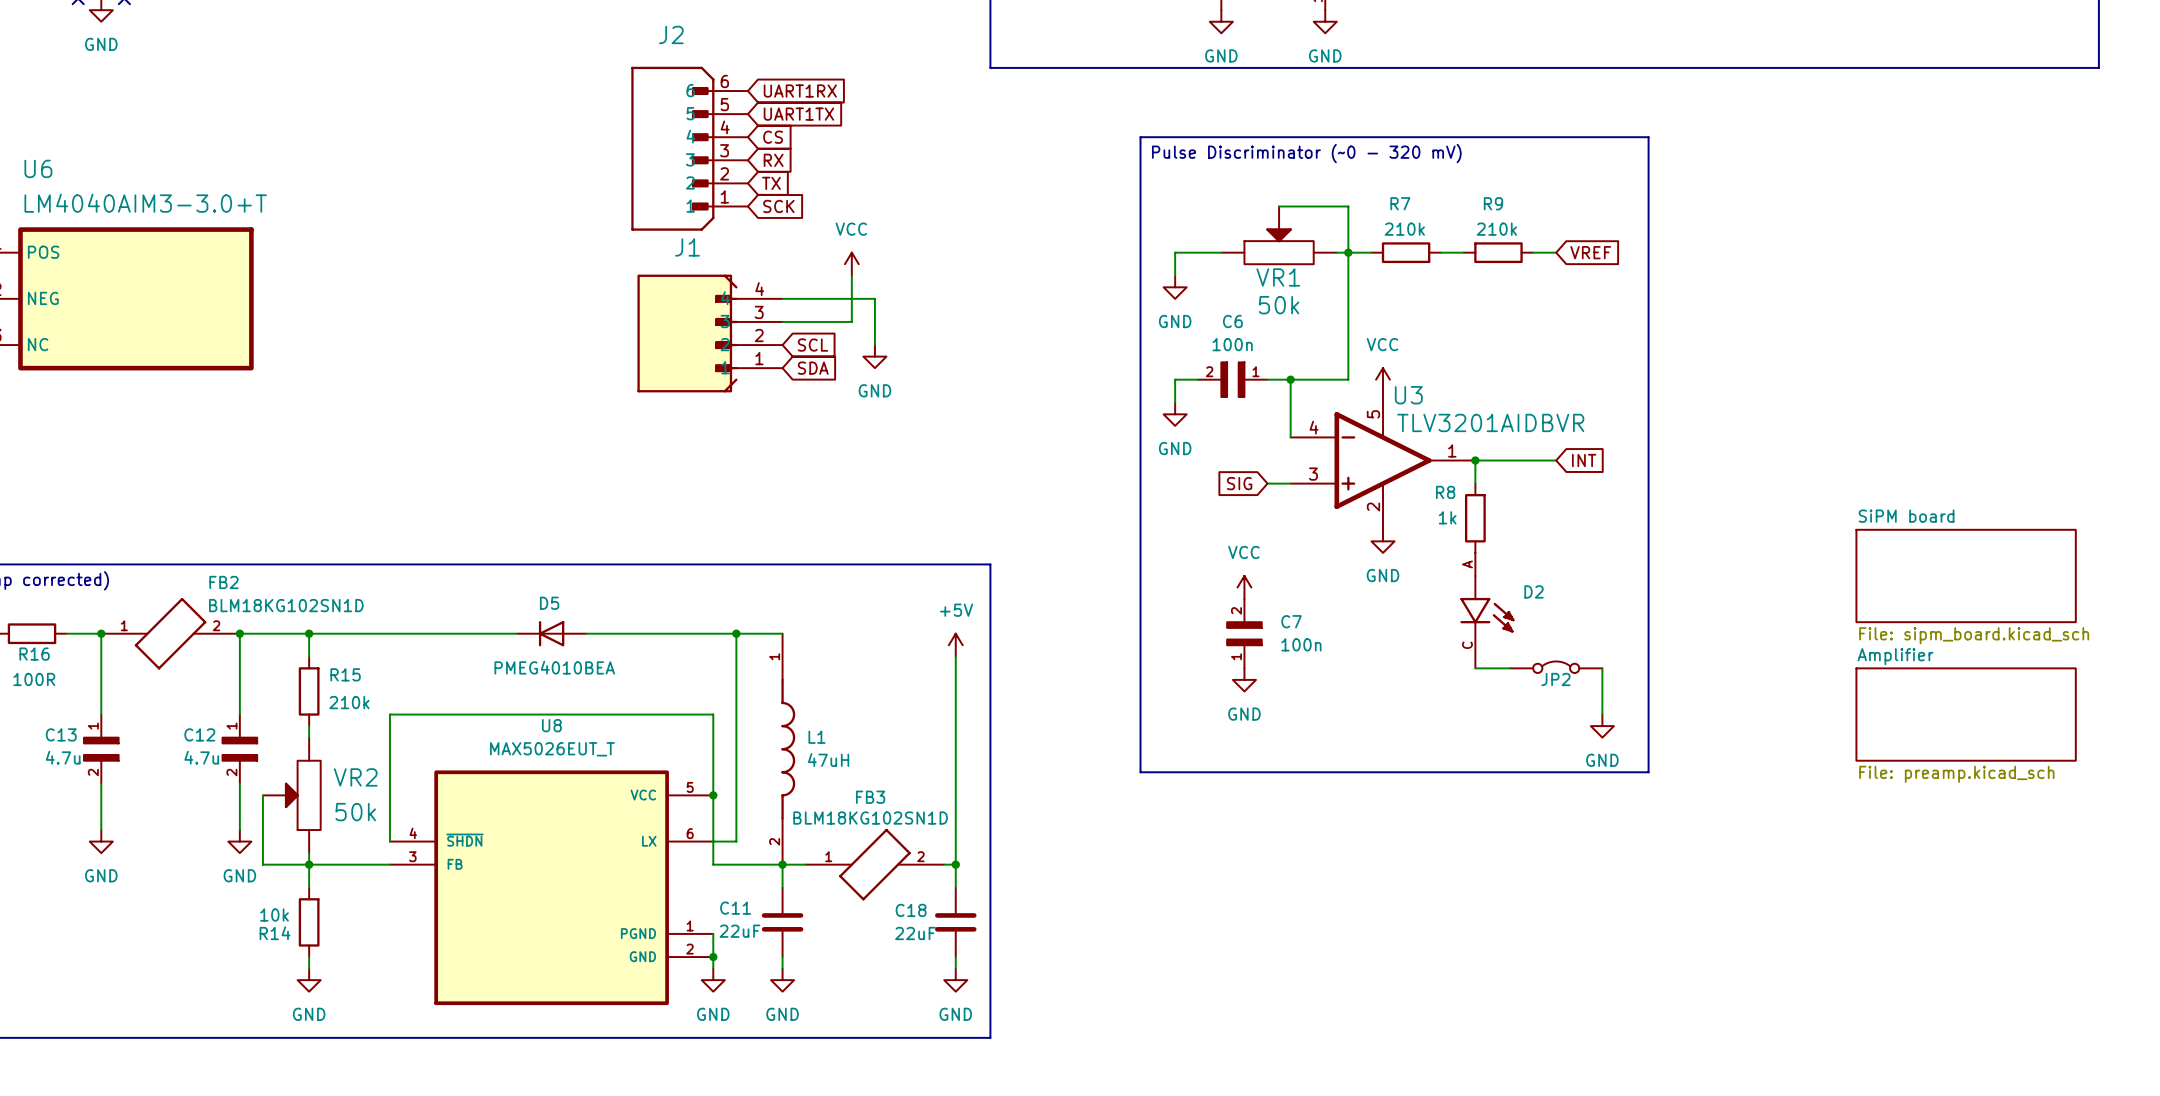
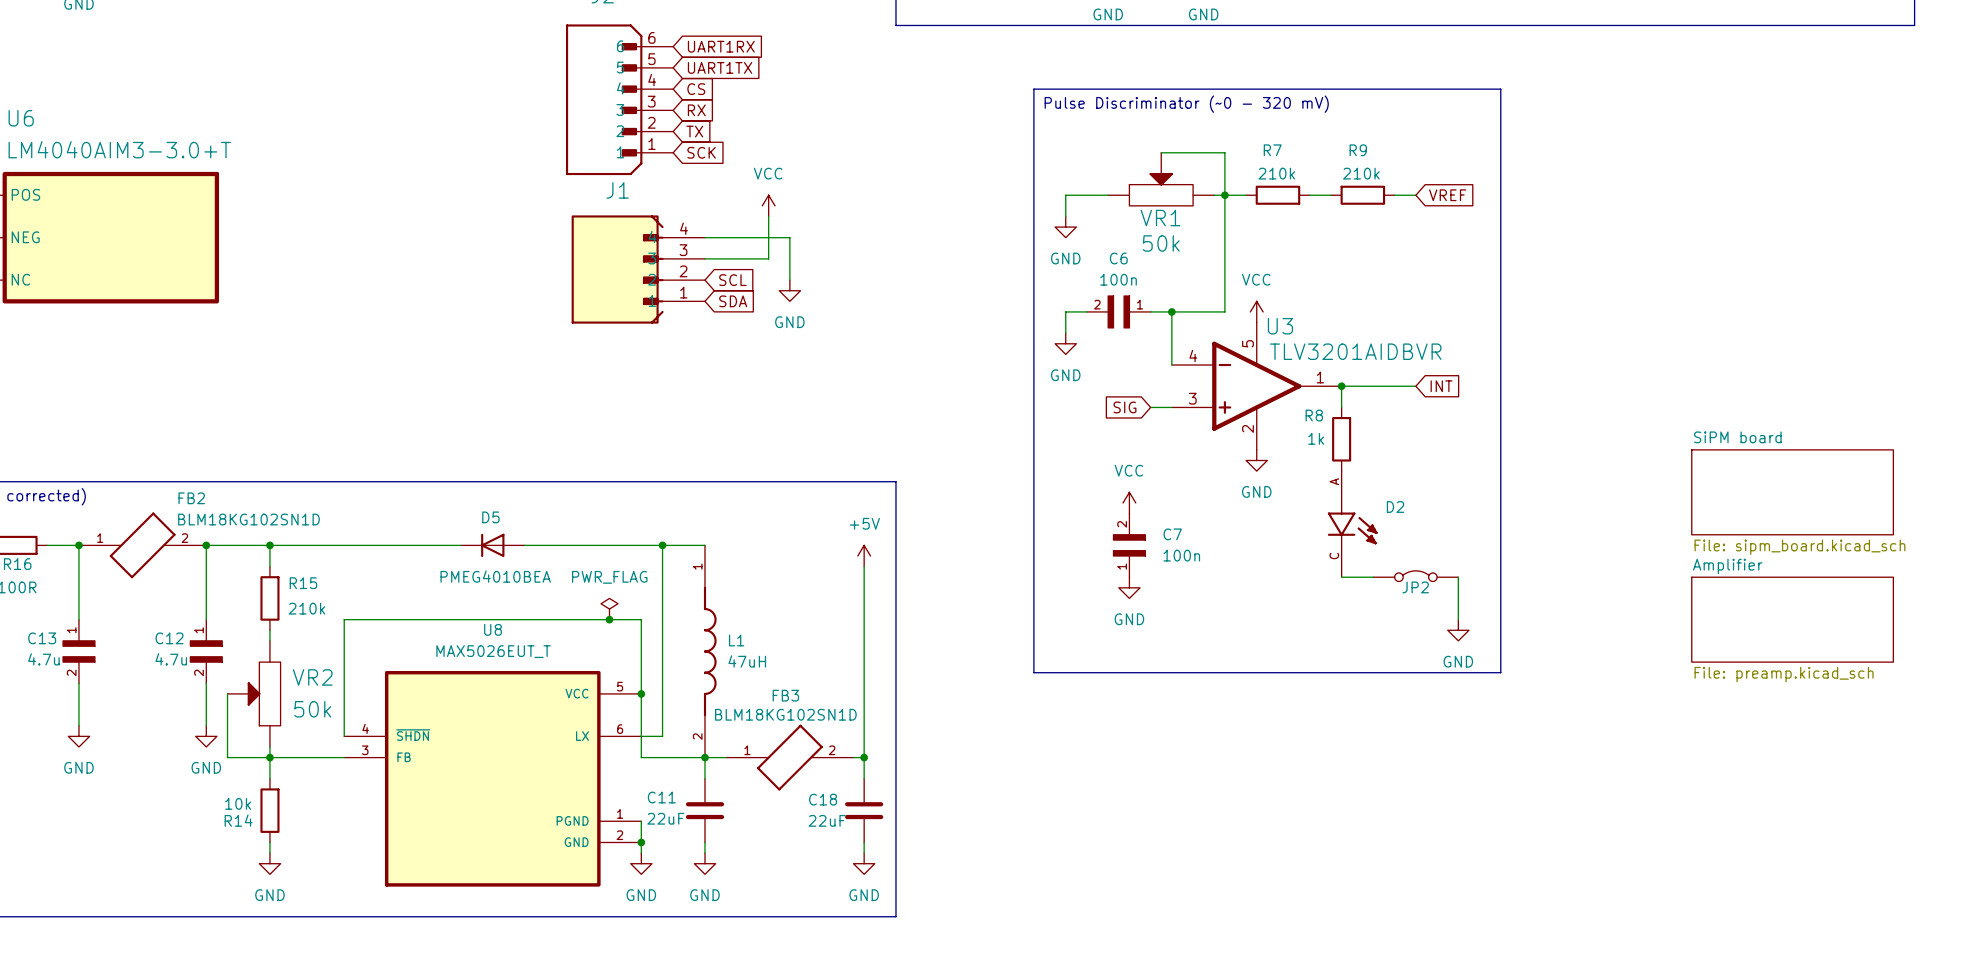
power symbol: none -> PWR_FLAG (609, 609)
junction: none -> (609, 619)

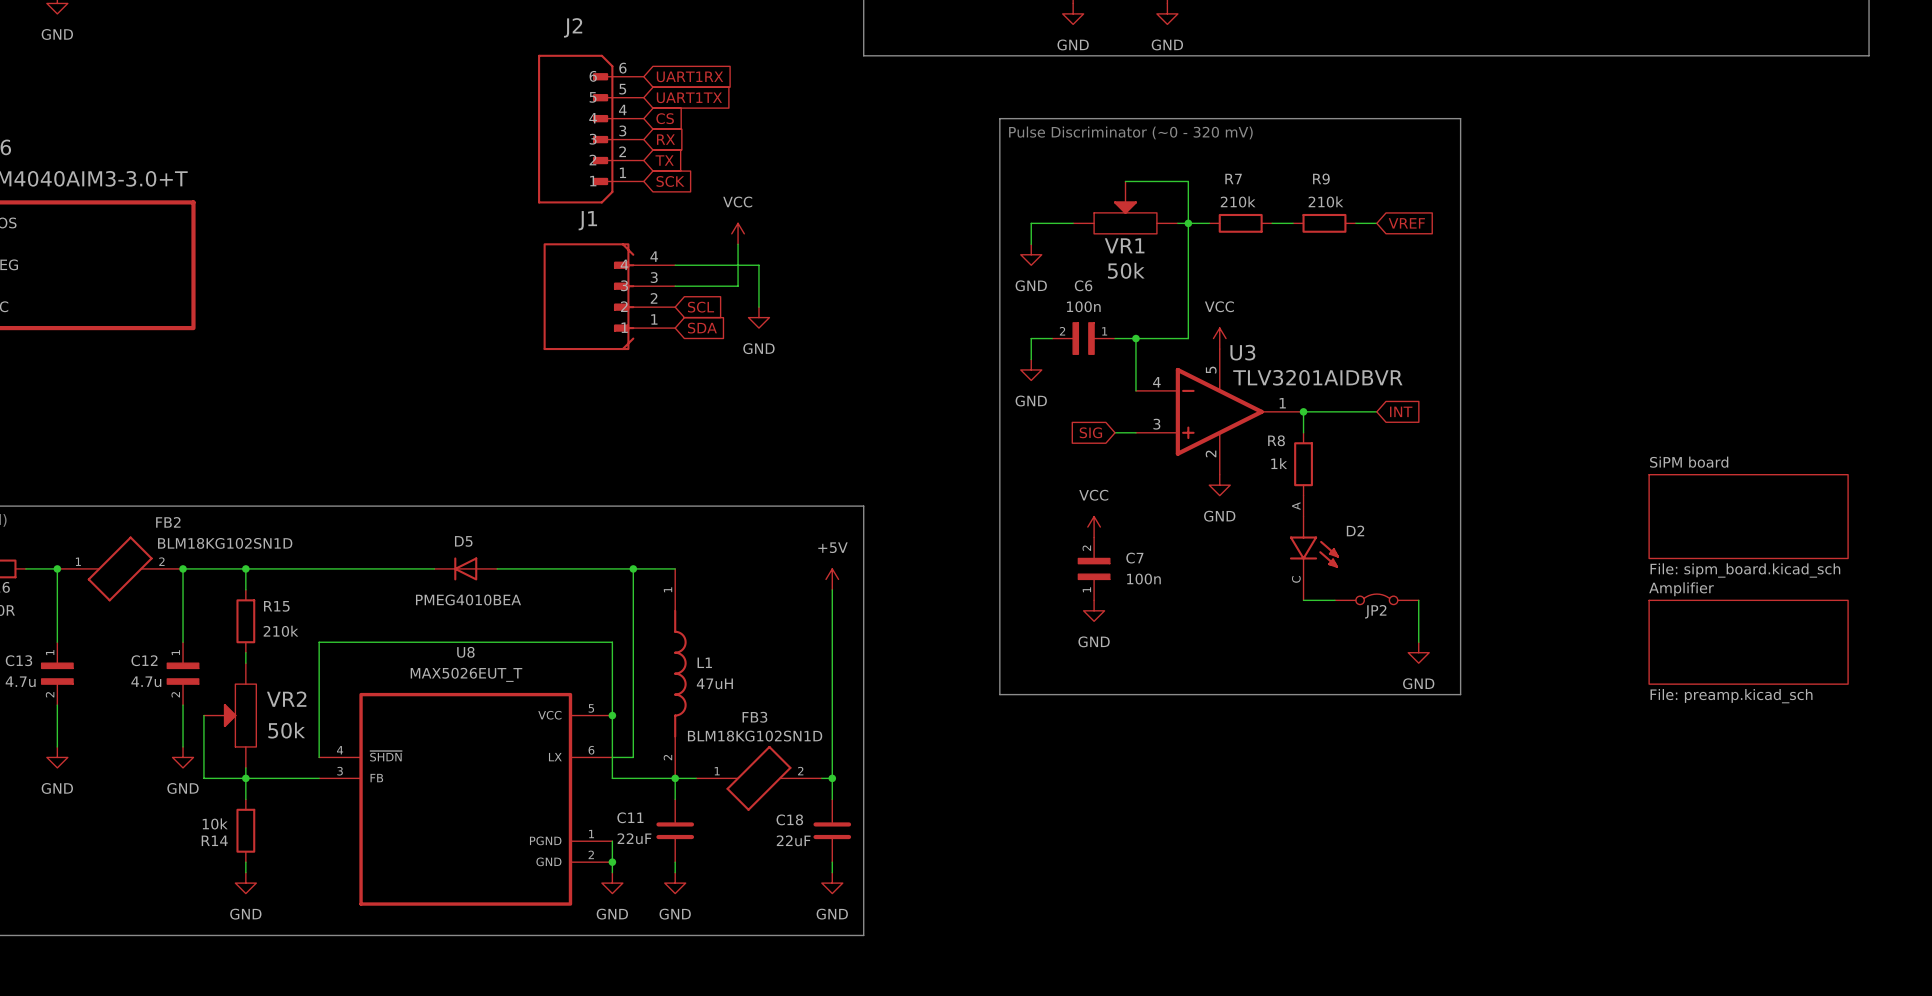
power symbol: PWR_FLAG (609, 609) -> none
junction: (609, 619) -> none

